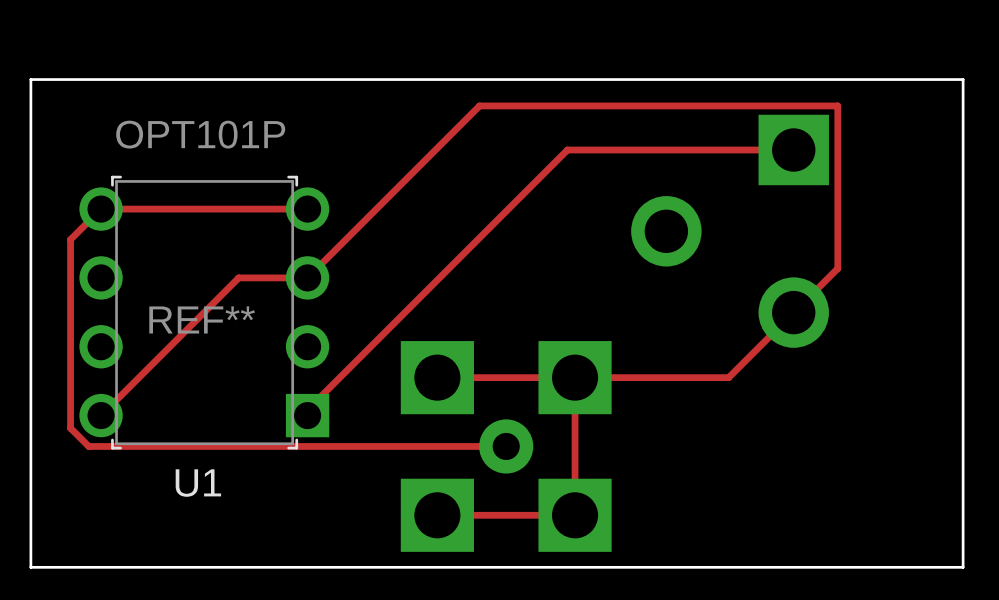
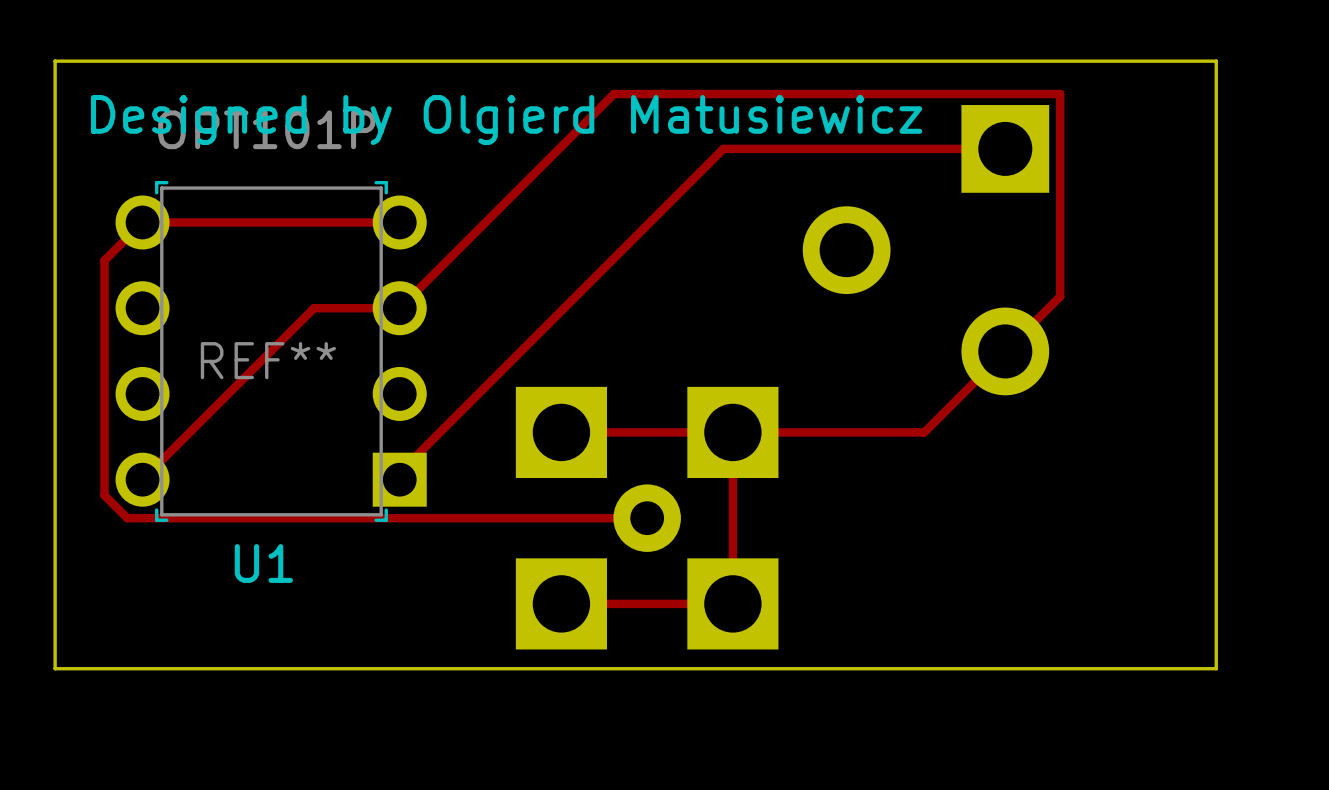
text: none -> Designed by Olgierd Matusiewicz (506, 120)

